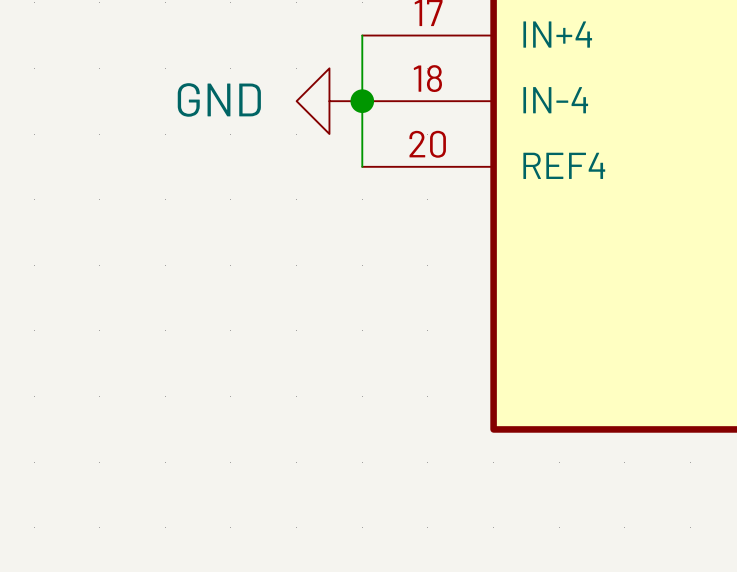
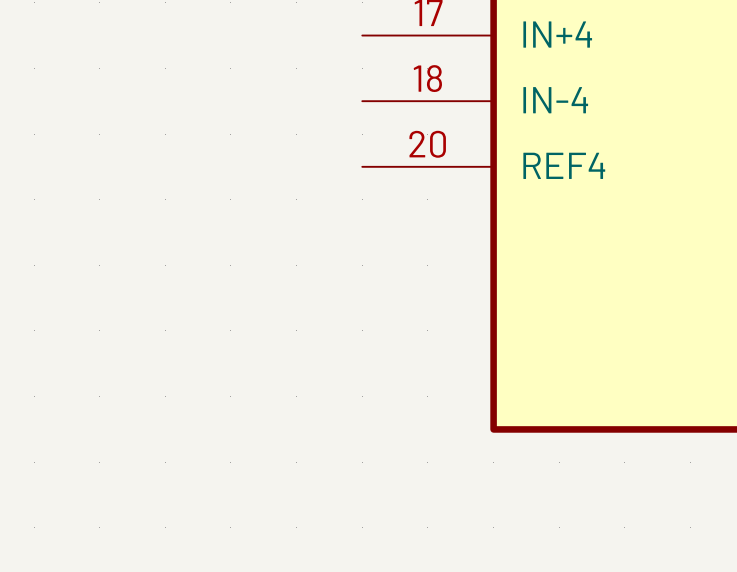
wire: (362, 35) (362, 166) -> none
power symbol: GND (329, 101) -> none
junction: (362, 101) -> none

